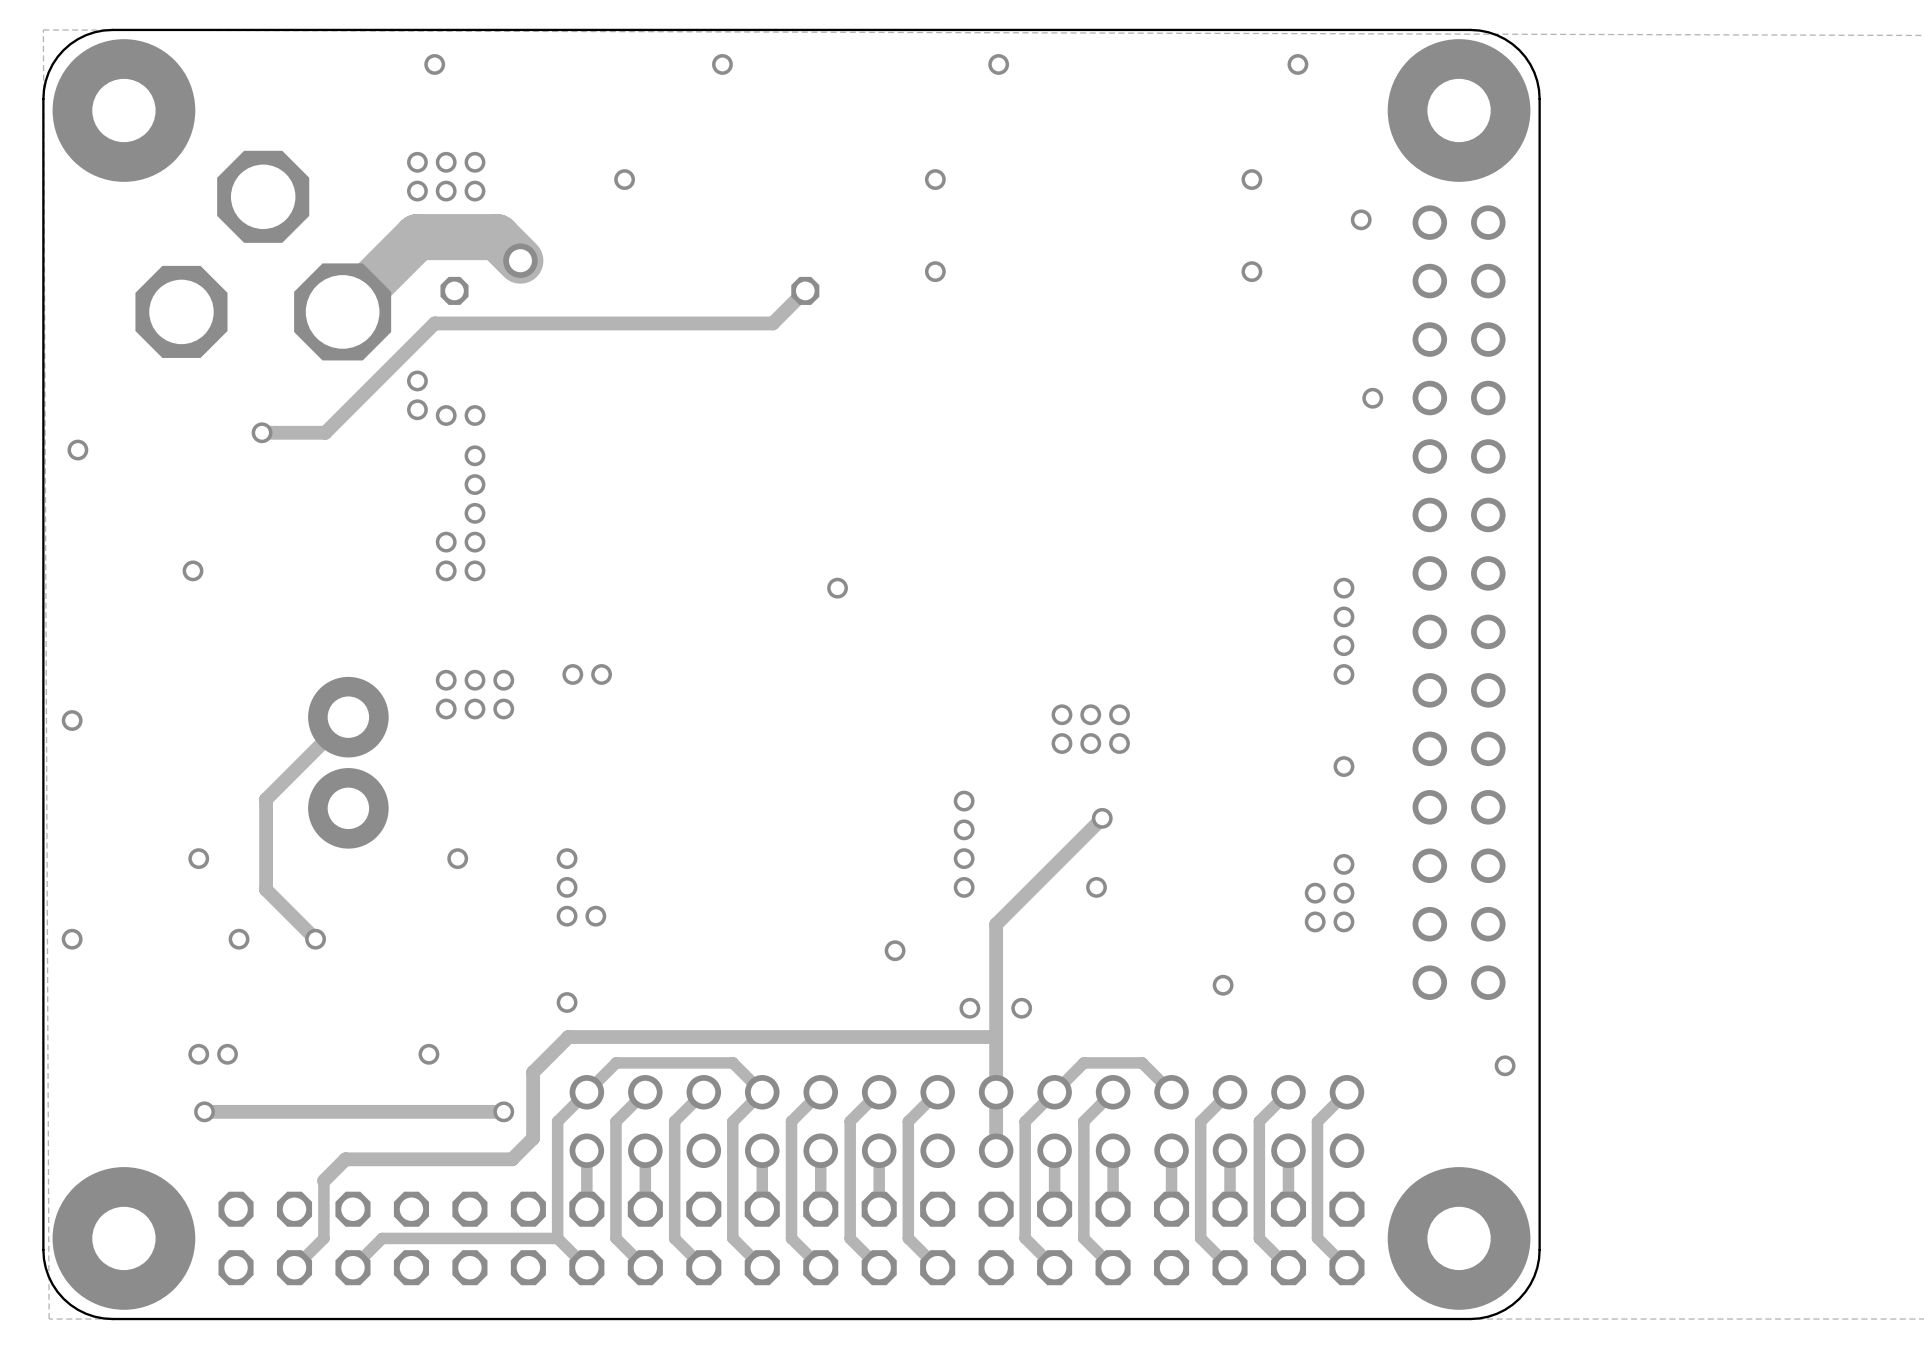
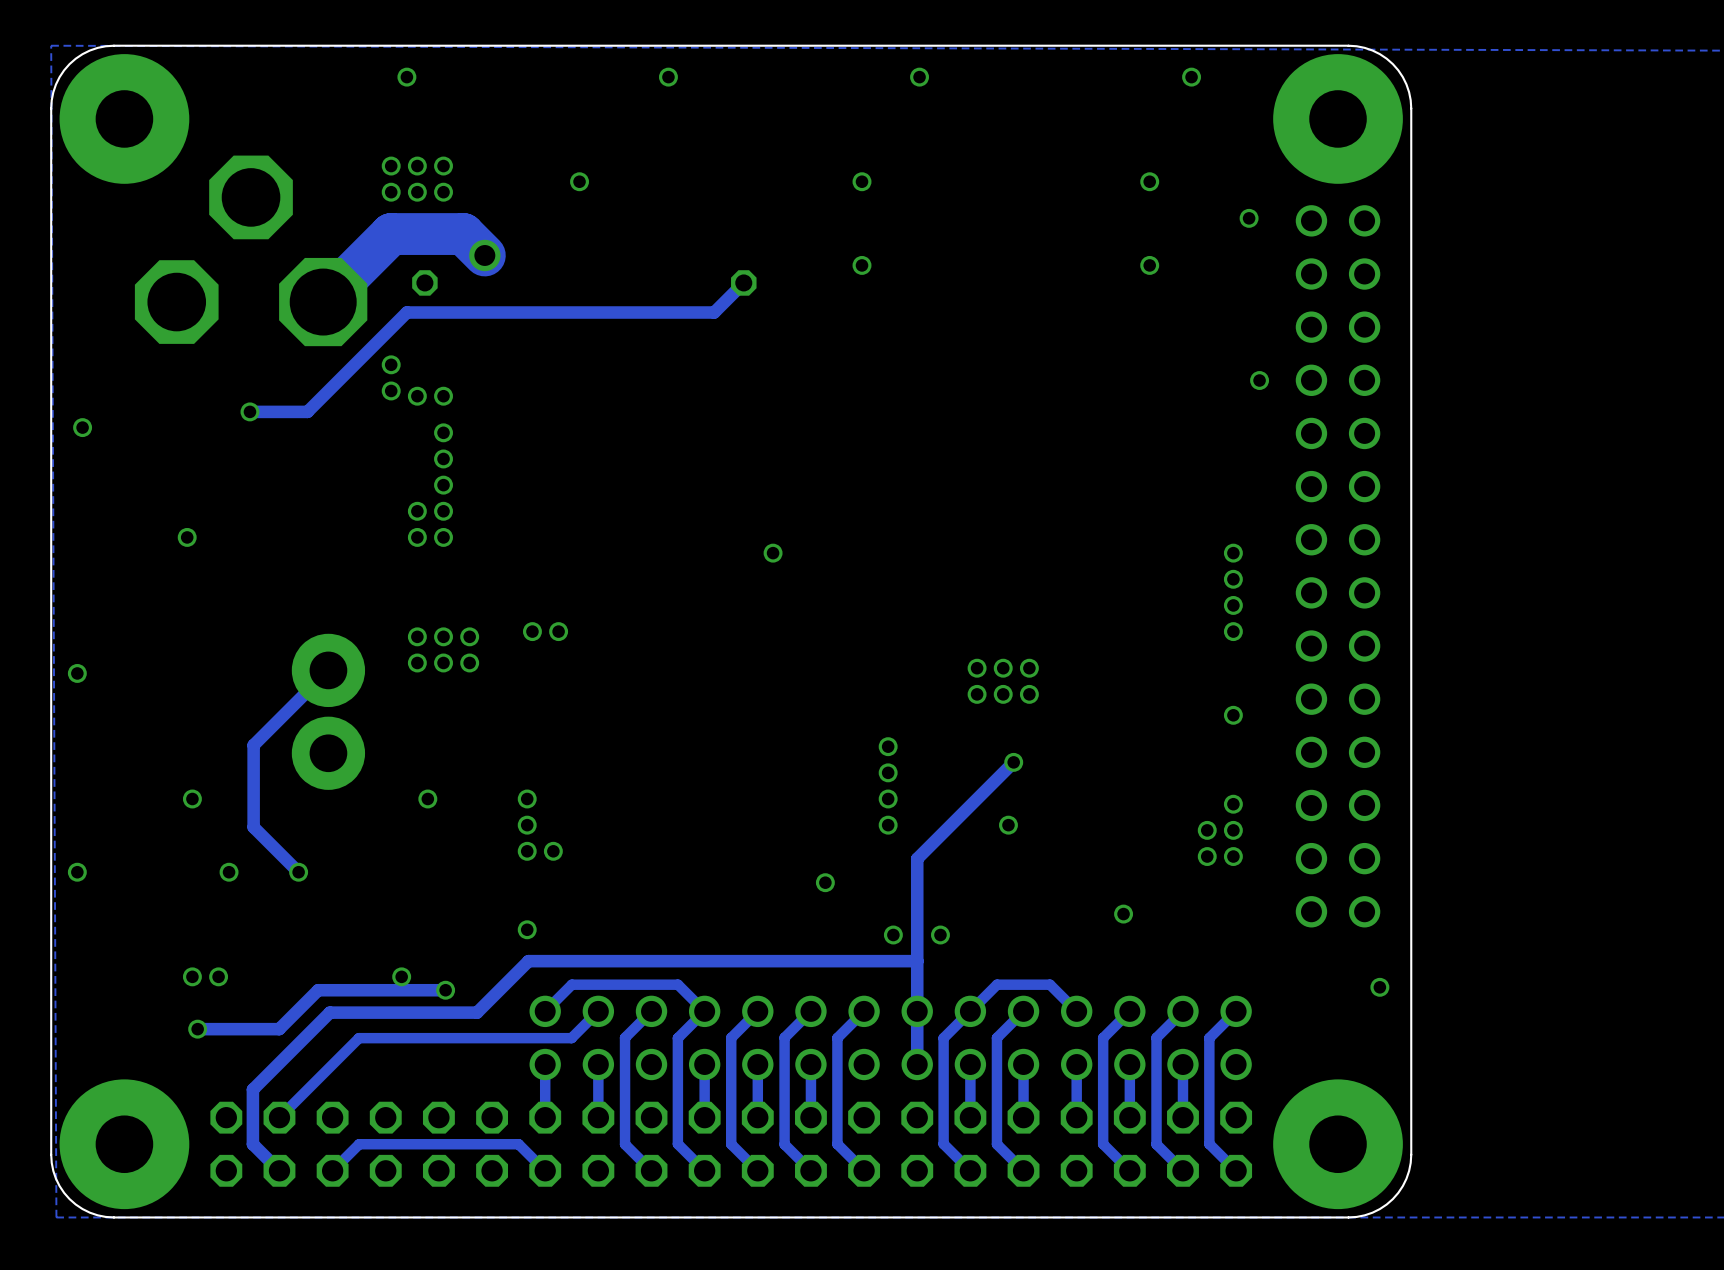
track: (533, 1072) (533, 1138) (512, 1159) (345, 1159) (323, 1180) (323, 1238) (294, 1267) -> (496, 993) (477, 1012) (329, 1012) (252, 1089) (252, 1144) (279, 1170)
track: (586, 1092) (557, 1121) (557, 1238) -> none
track: (503, 1111) (294, 1111) -> (445, 990) (318, 990) (279, 1029)
via position: (503, 1111) -> (445, 990)
track: (615, 1121) (615, 1238) (645, 1267) -> (571, 1038) (358, 1038) (279, 1117)

